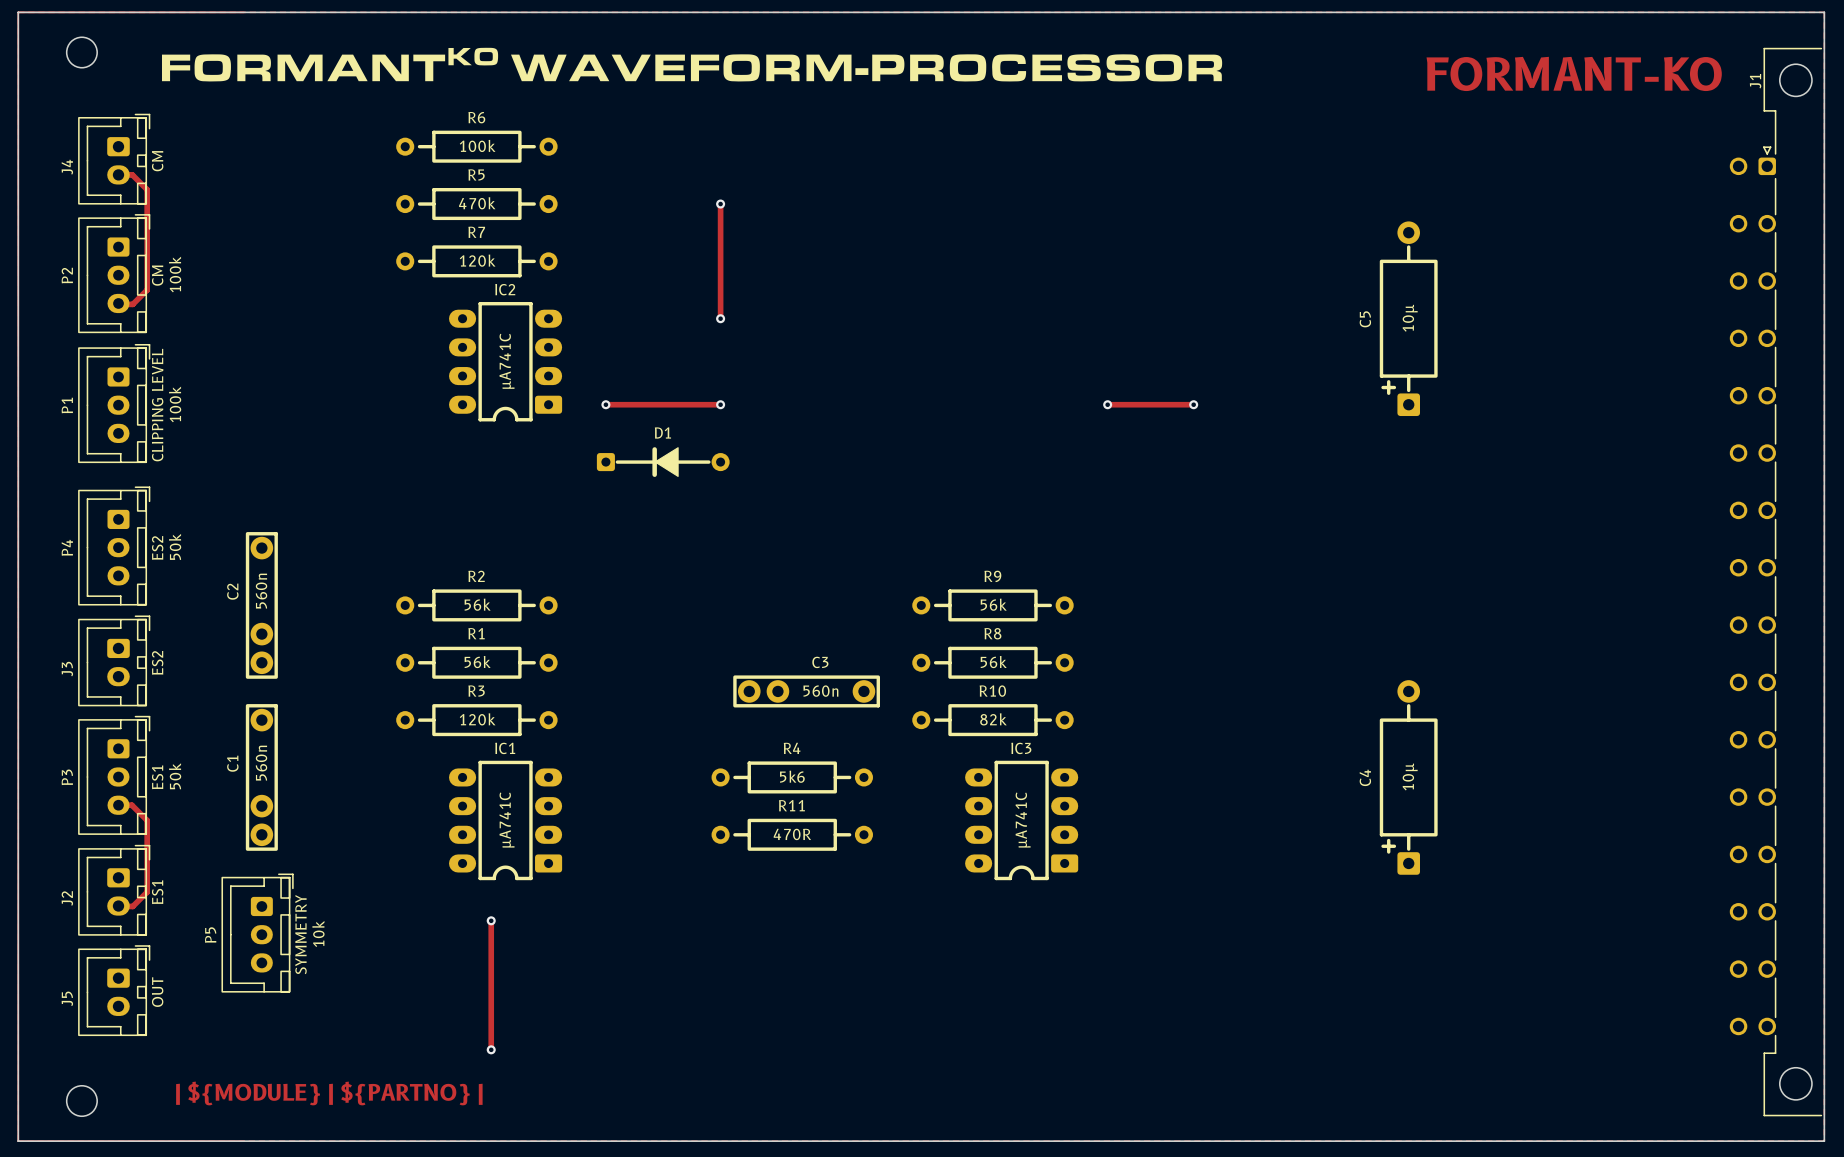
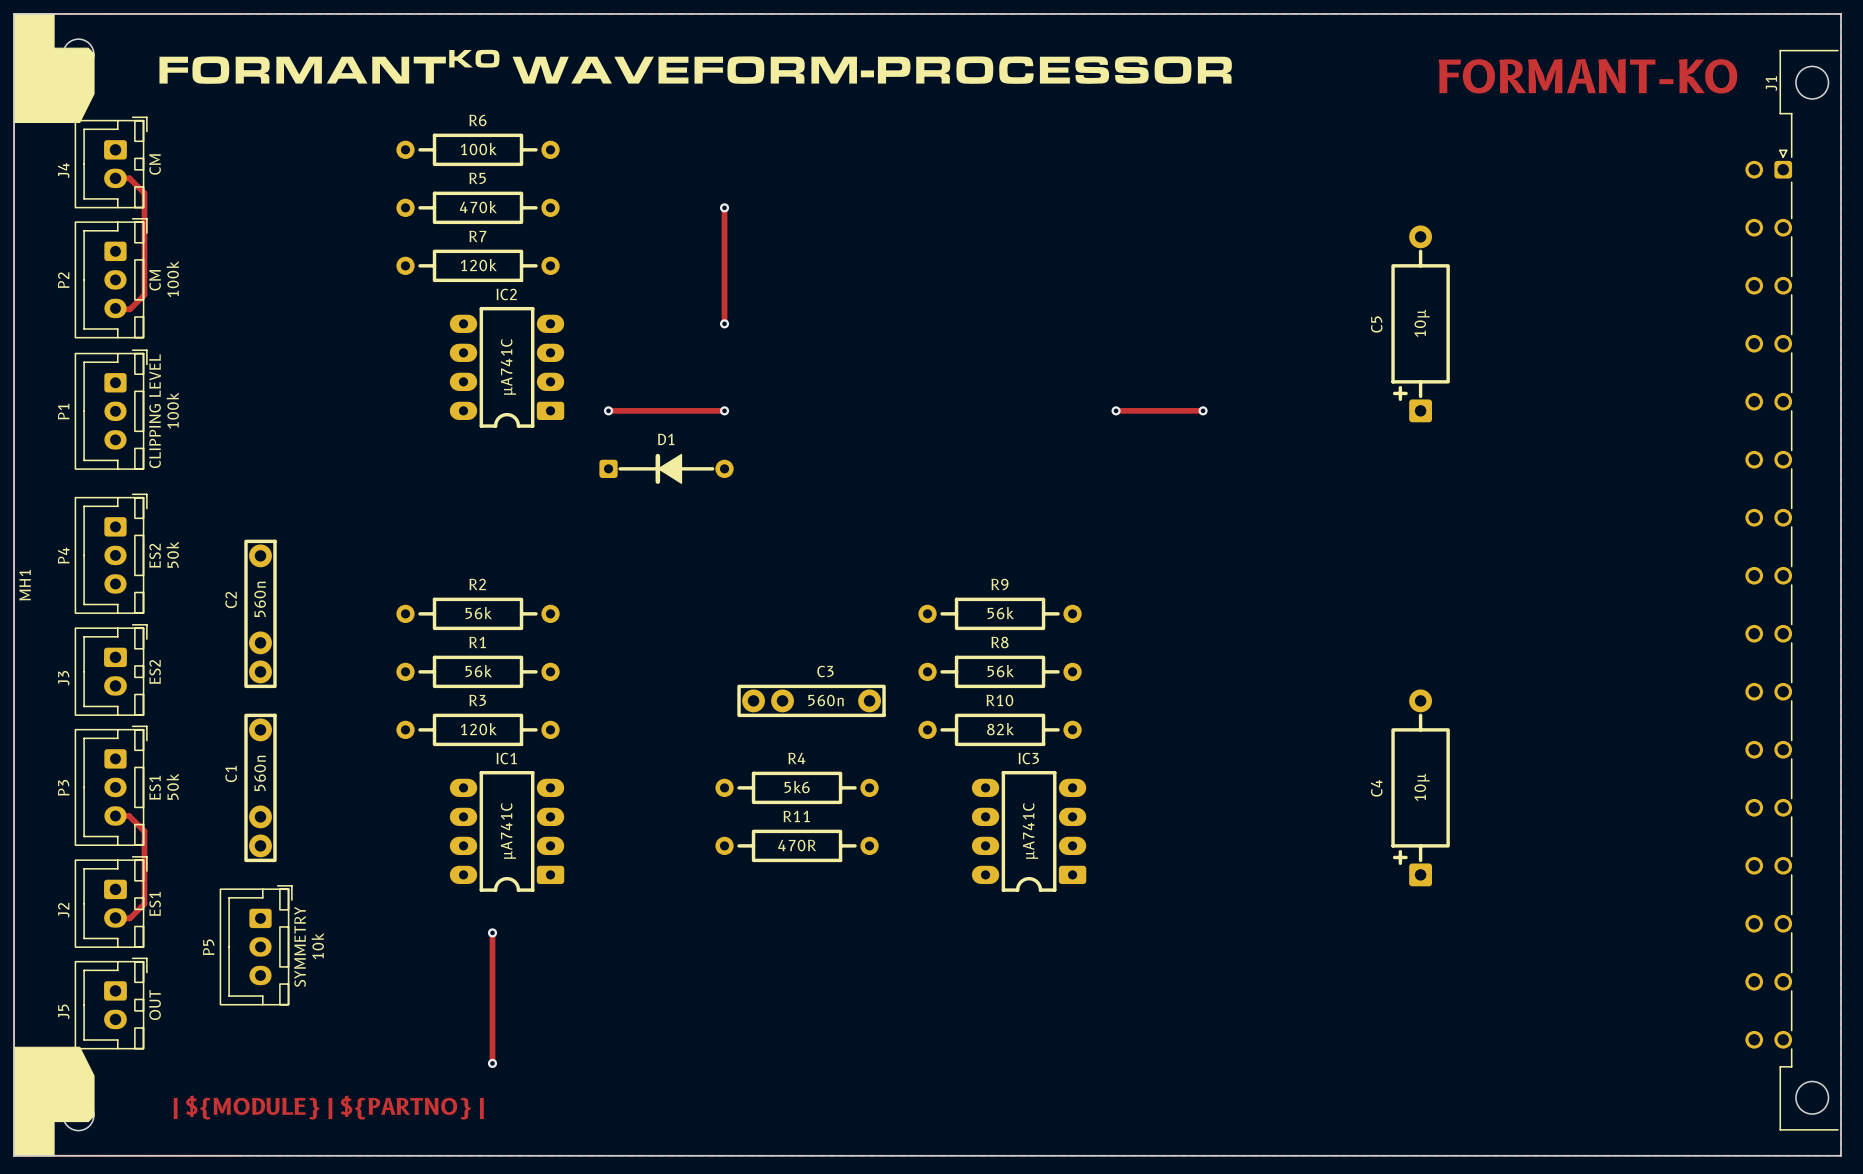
MH1: none -> (54, 584)

